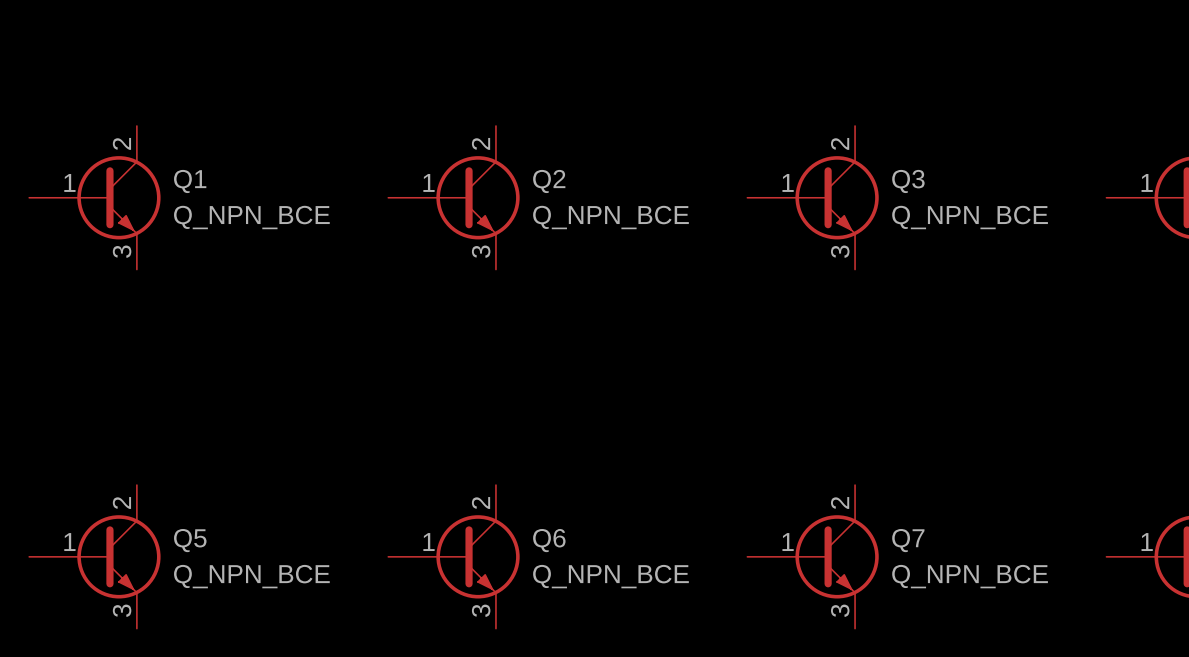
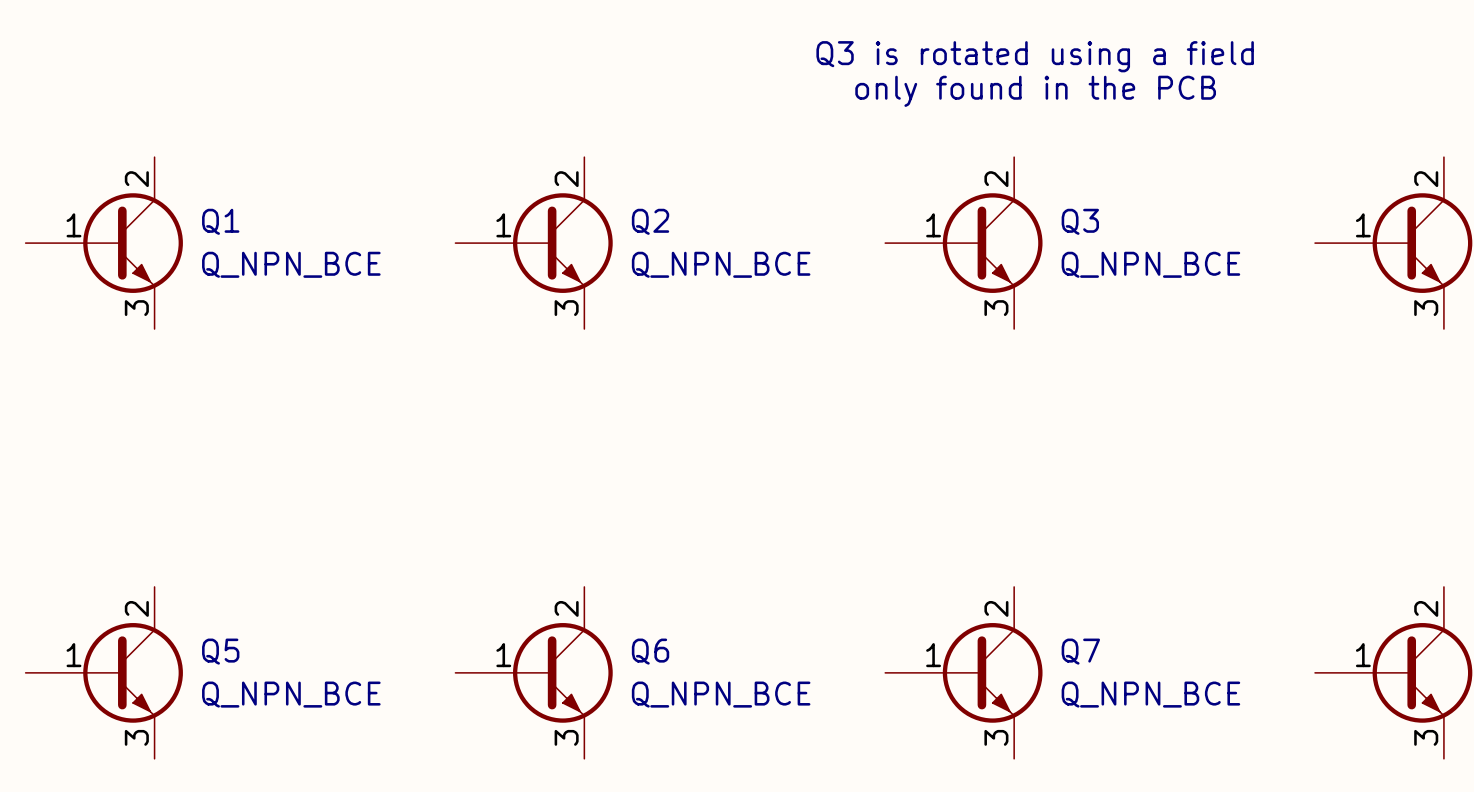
text: none -> Q3 is rotated using a field (1035, 56)
text: none -> only found in the PCB (1035, 91)

